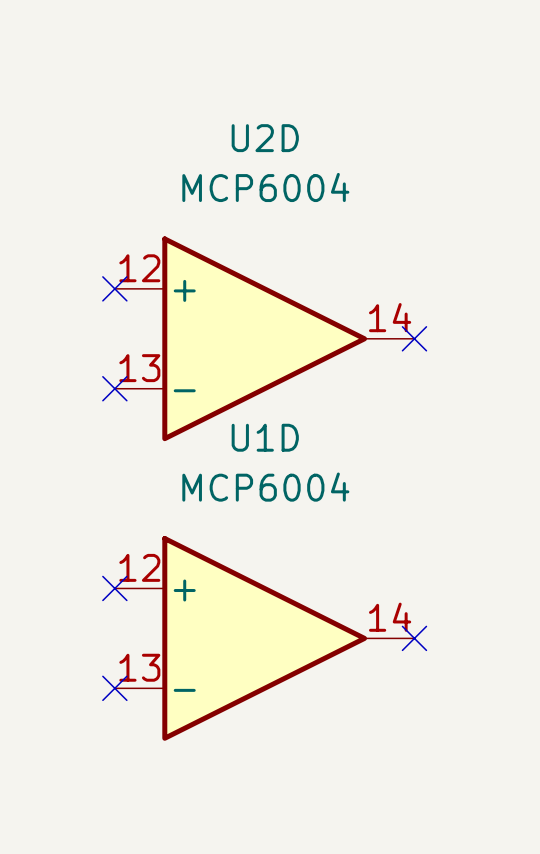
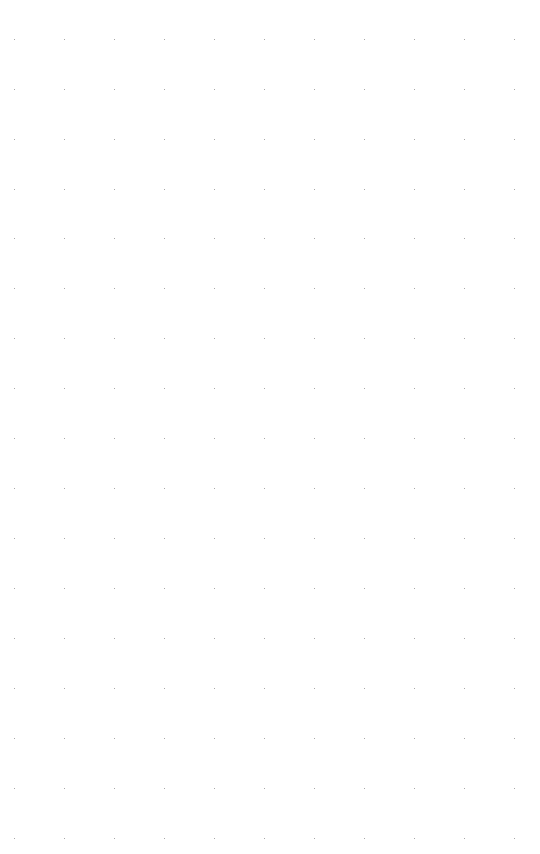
no-connect mark: (114, 288) -> none
U2D: MCP6004 (264, 338) -> none
no-connect mark: (414, 338) -> none
no-connect mark: (114, 388) -> none
no-connect mark: (114, 588) -> none
U1D: MCP6004 (264, 638) -> none
no-connect mark: (414, 638) -> none
no-connect mark: (114, 688) -> none

